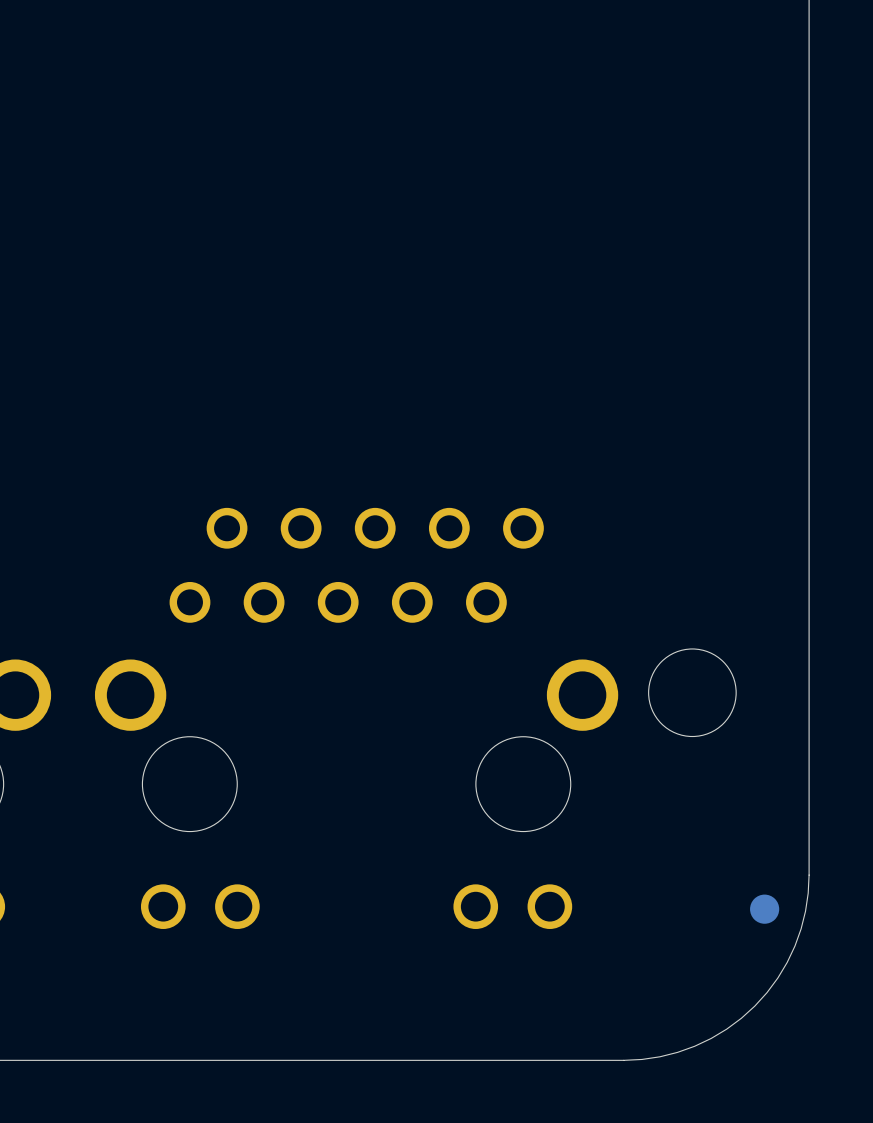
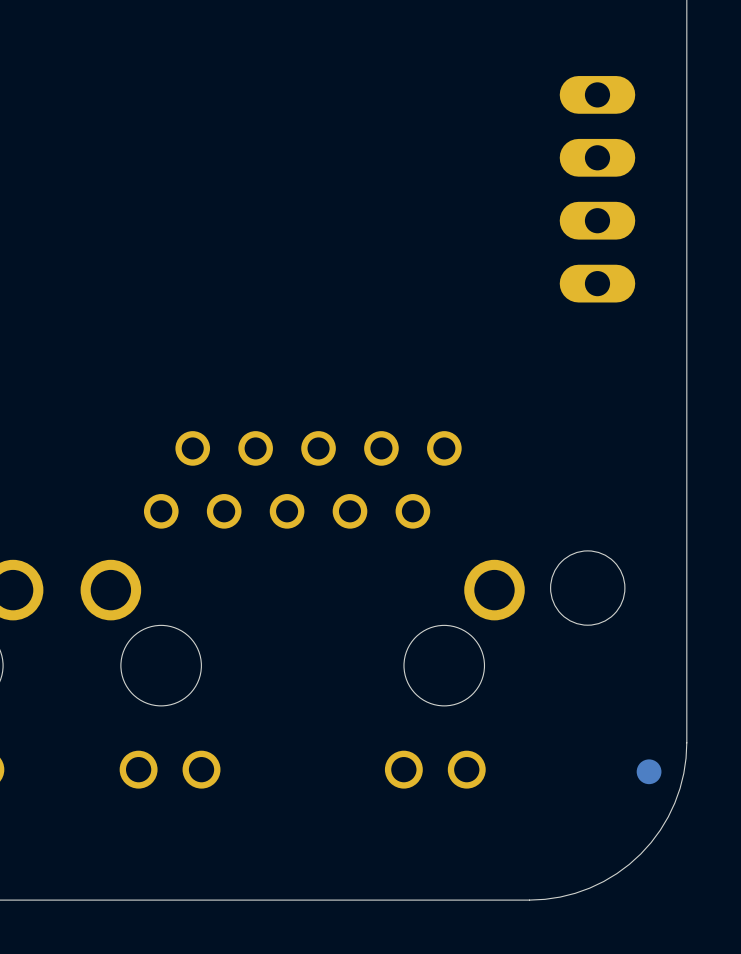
part: none -> (597, 189)

